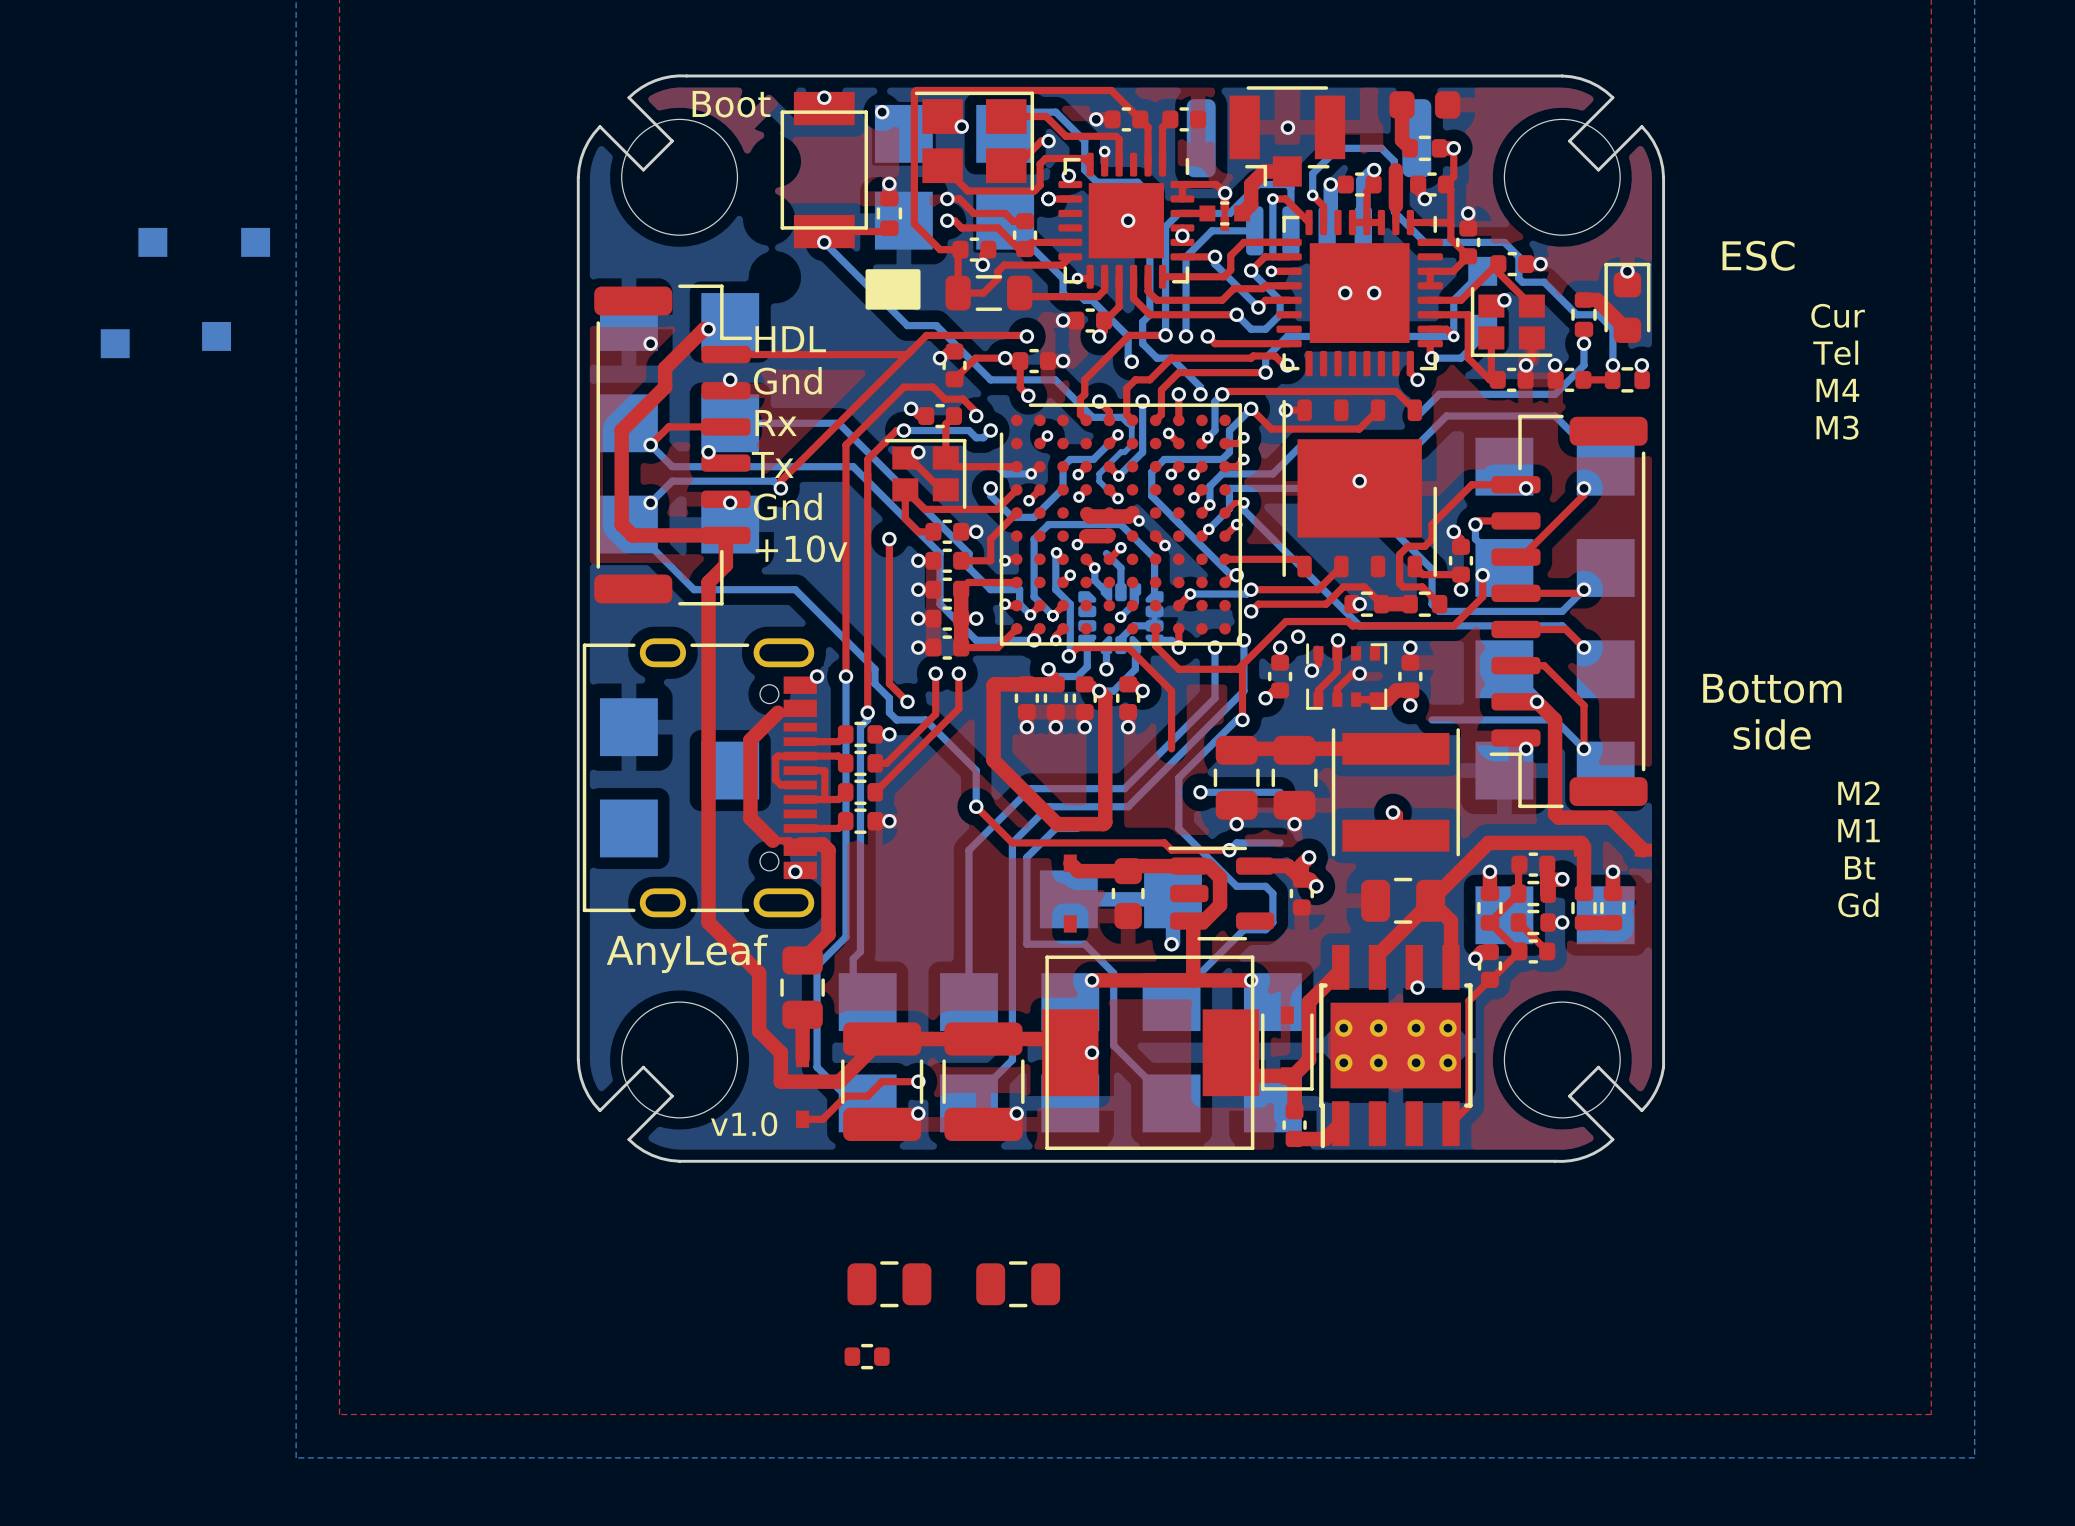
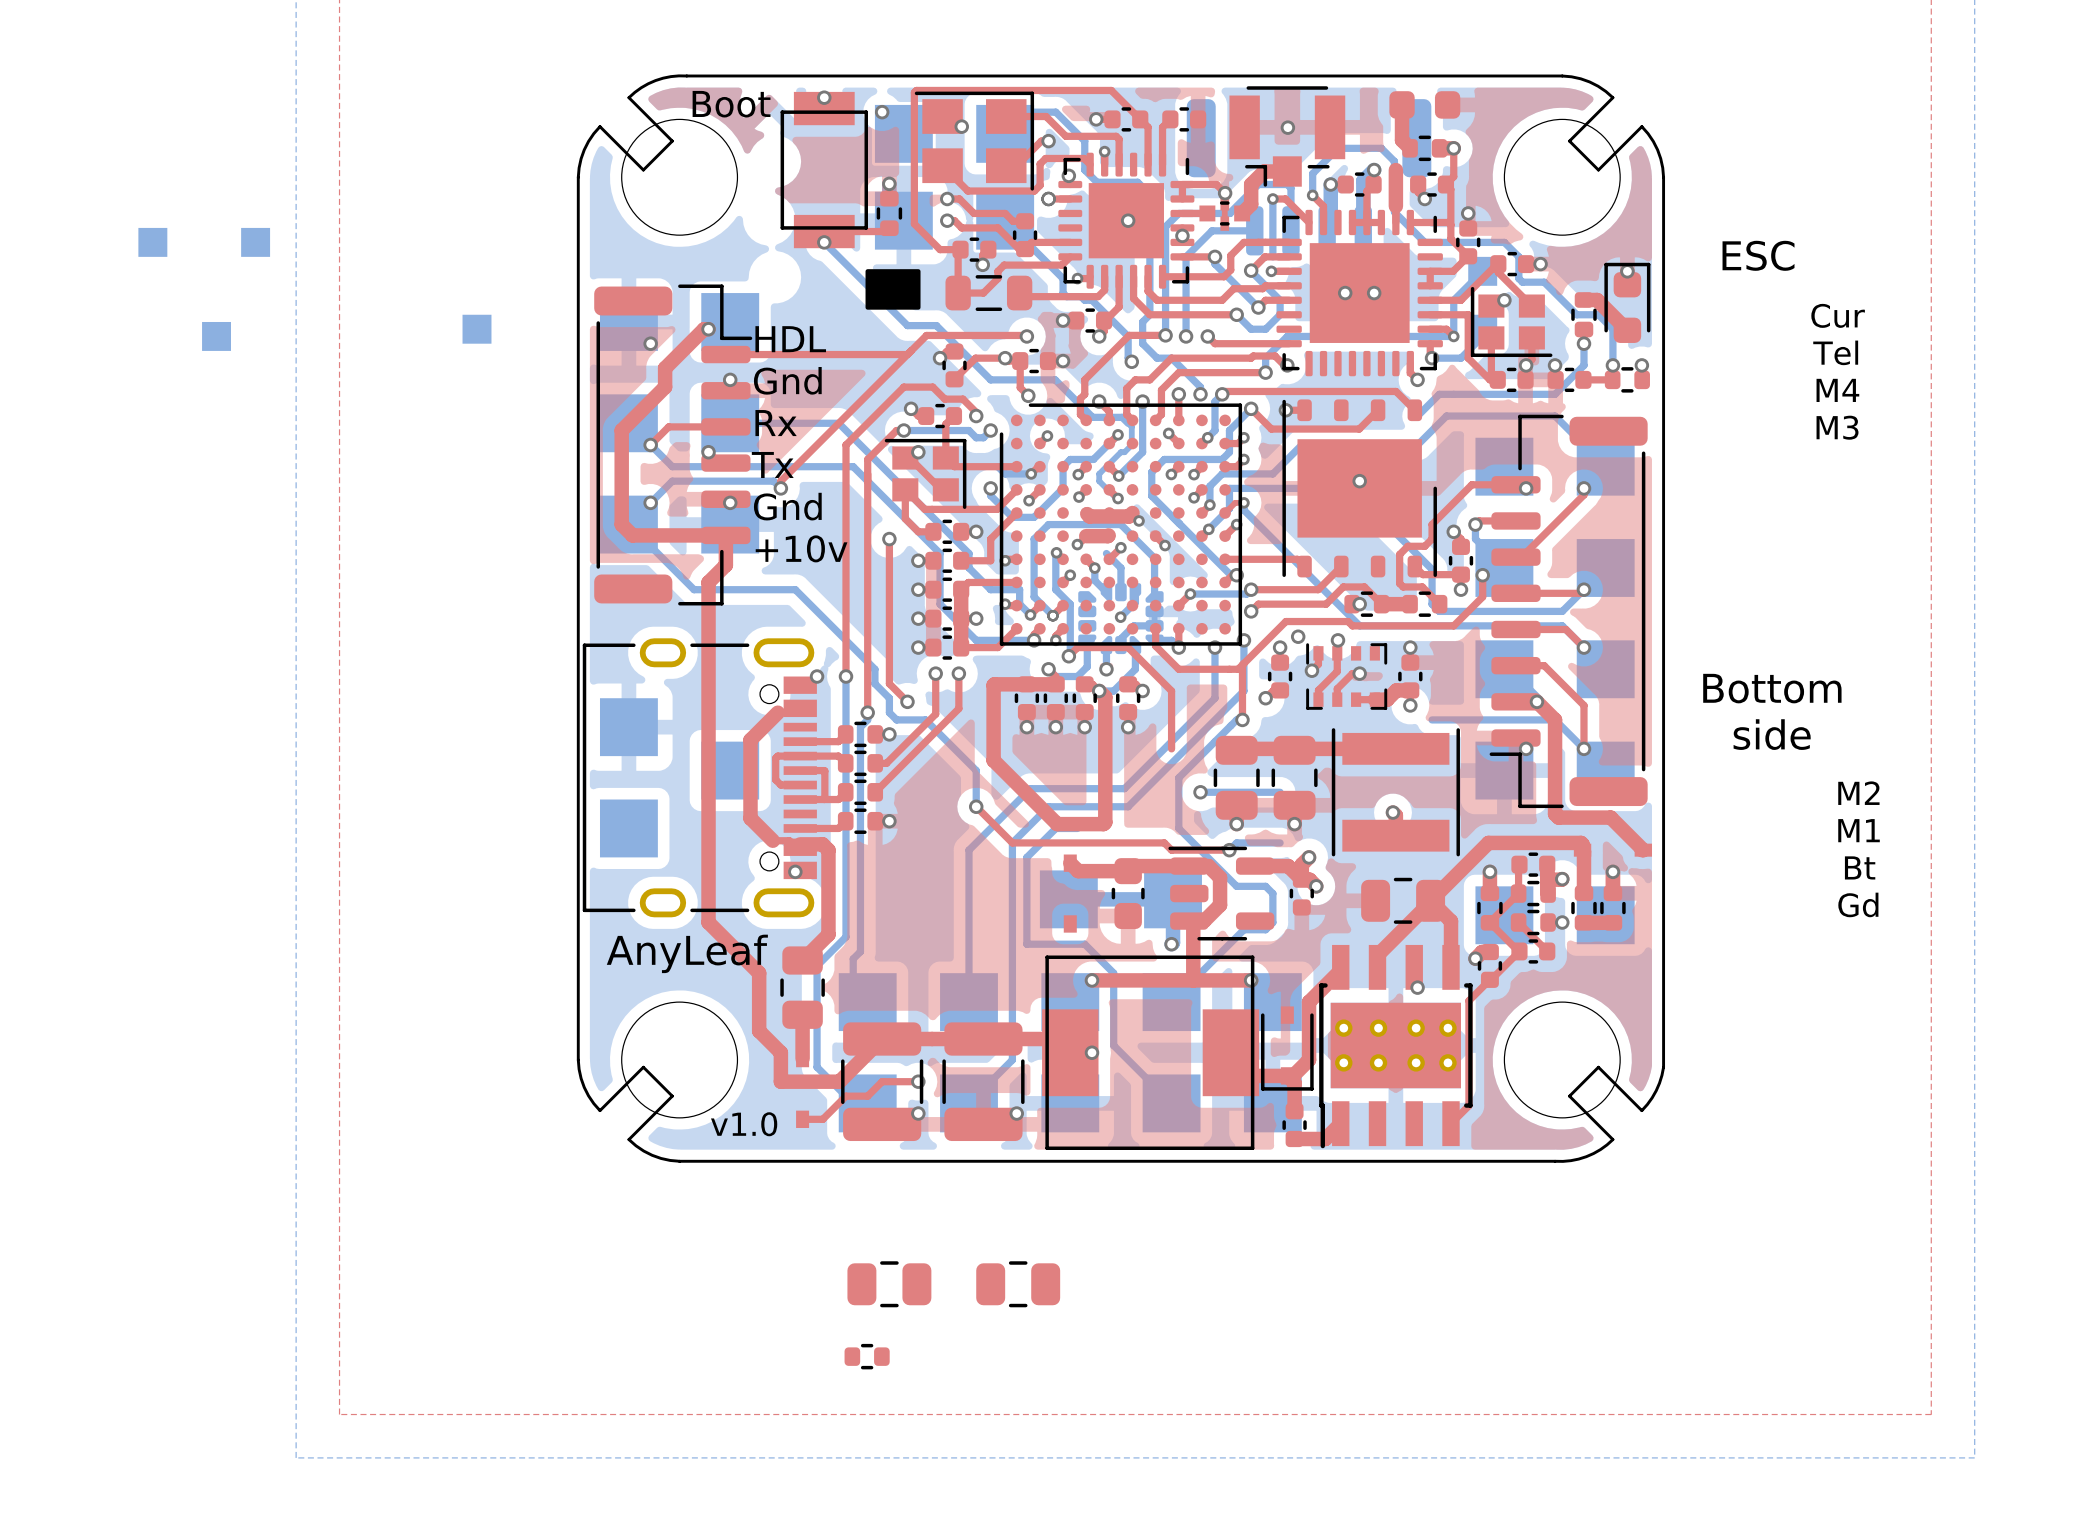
part position: (115, 343) -> (476, 329)

